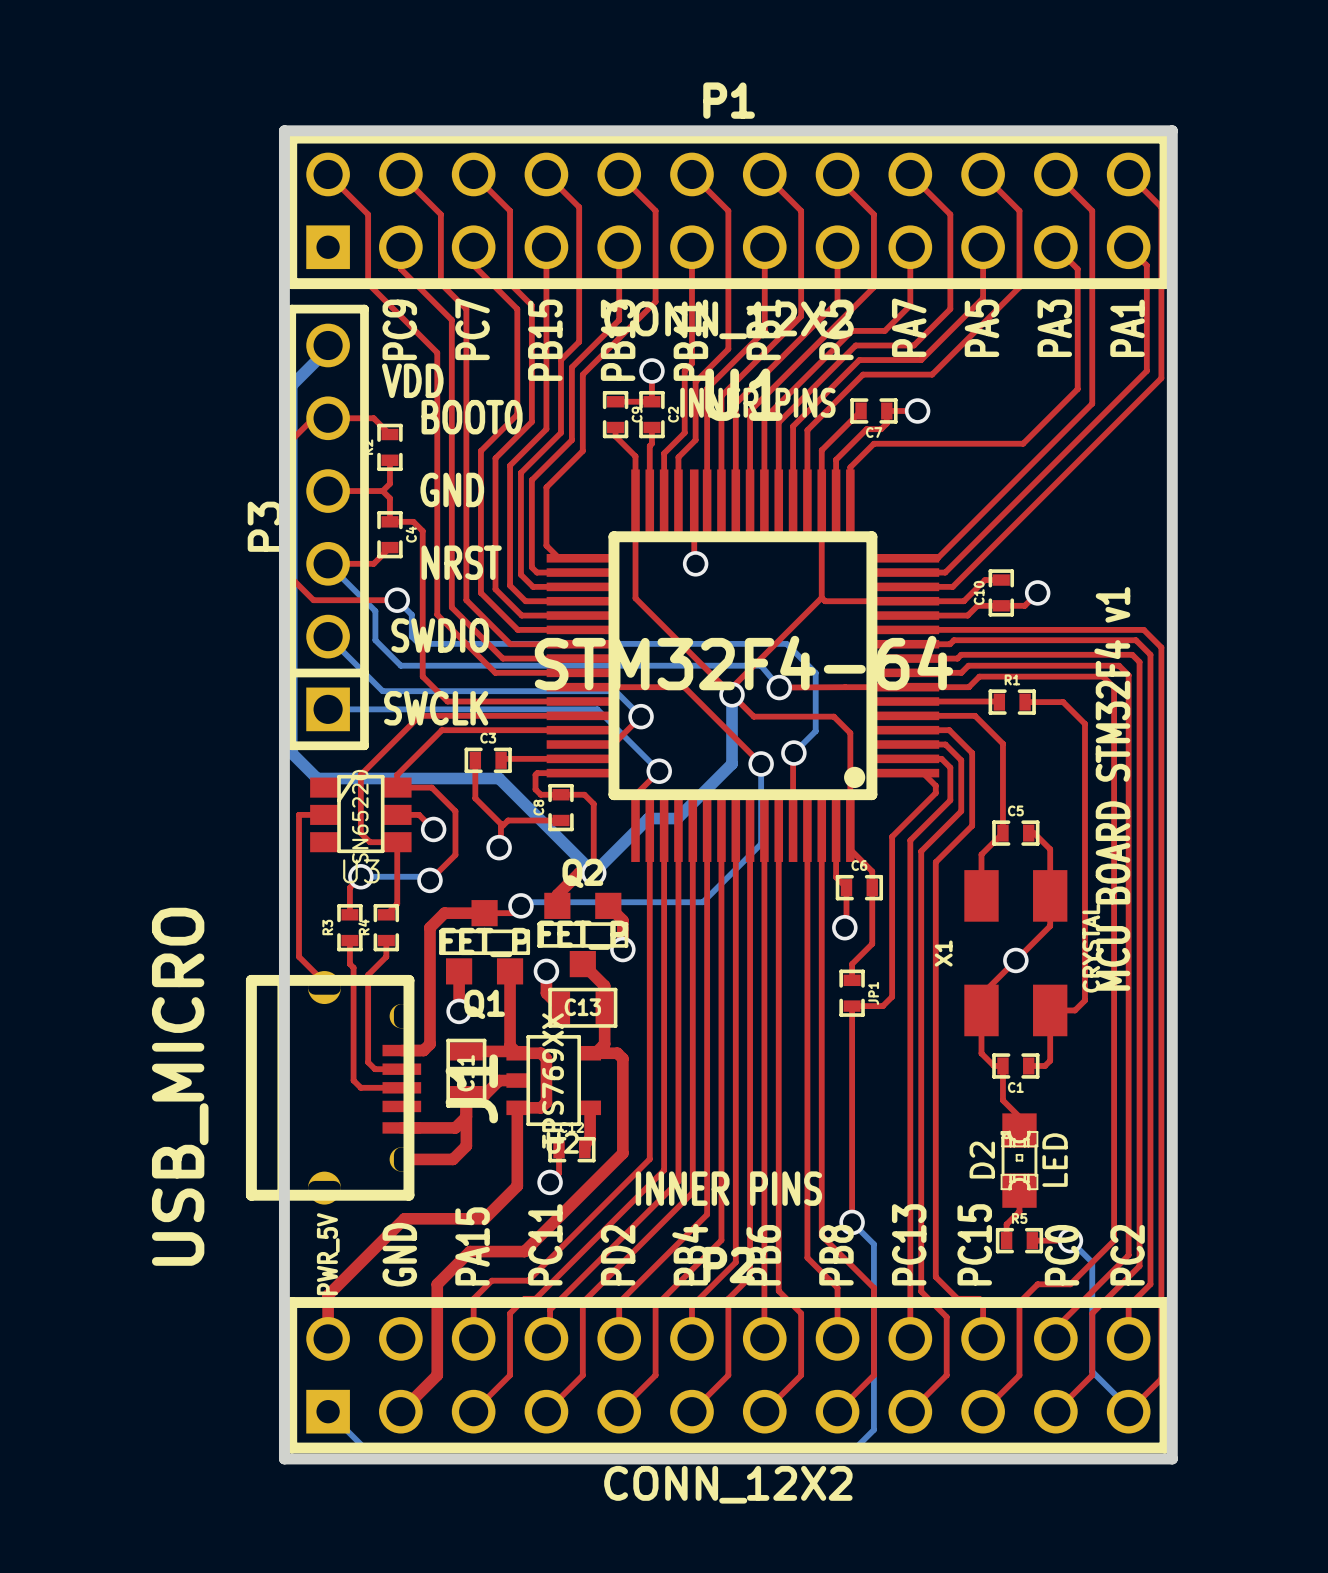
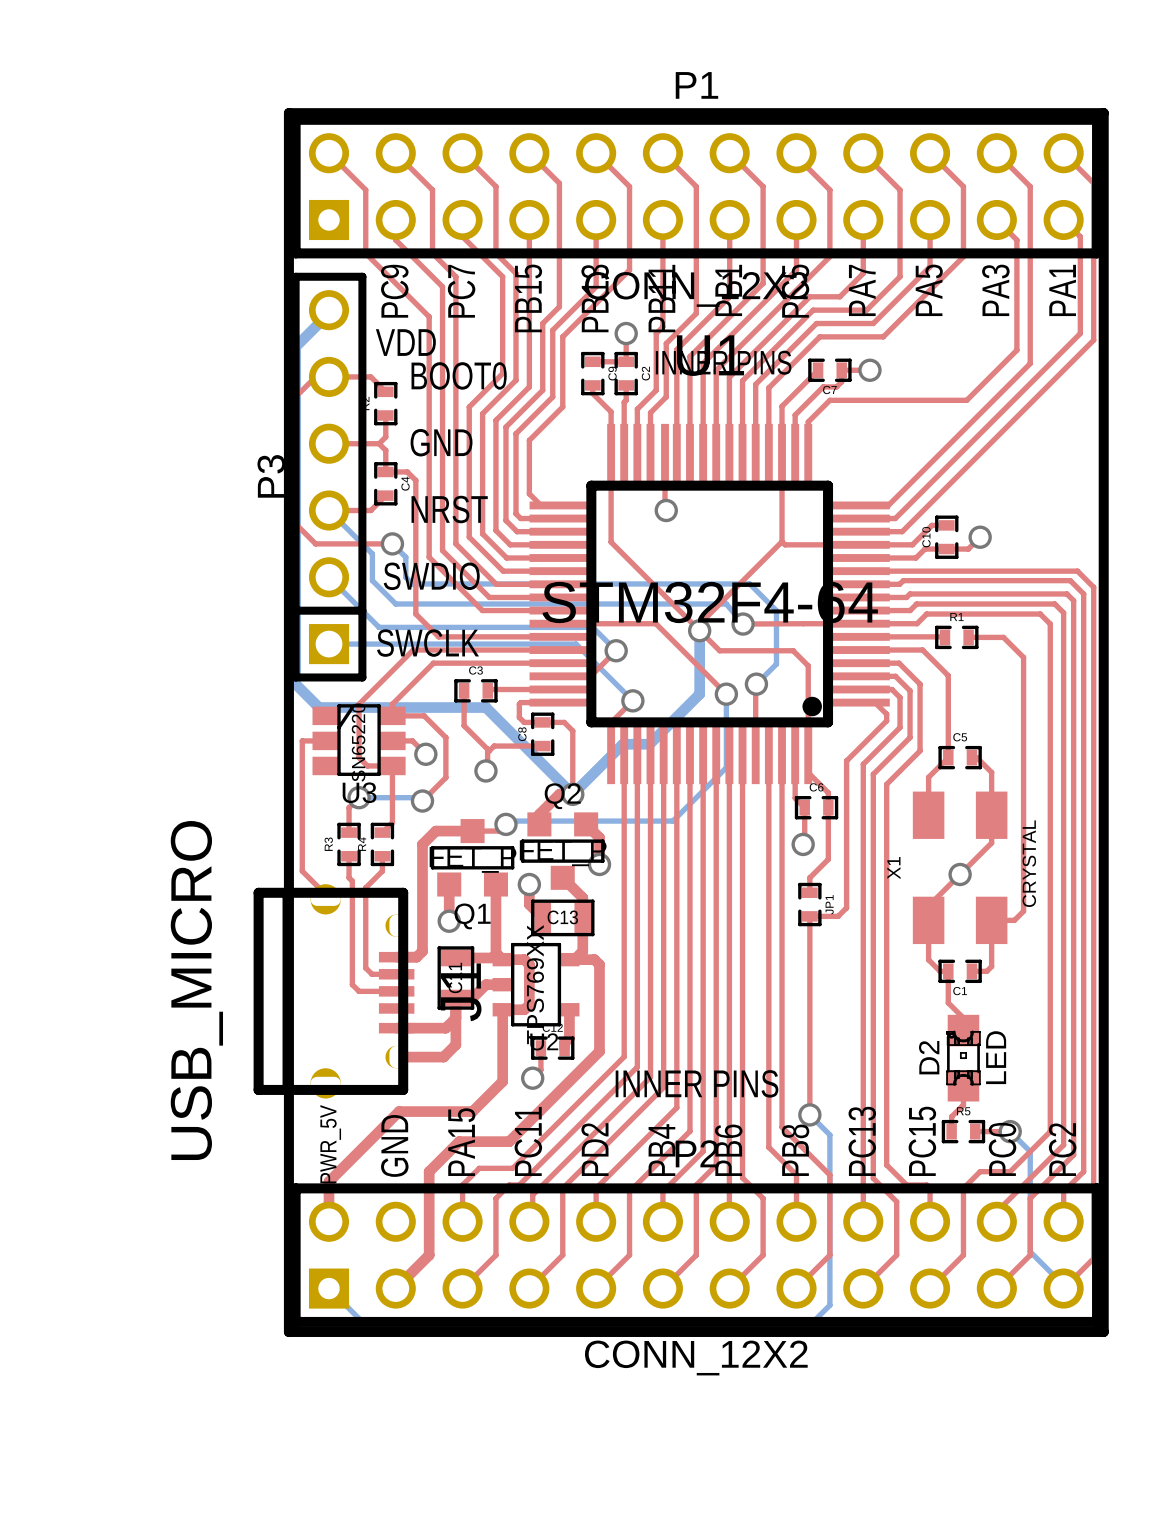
text: MCU BOARD STM32F4 v1 (1112, 788) -> none

